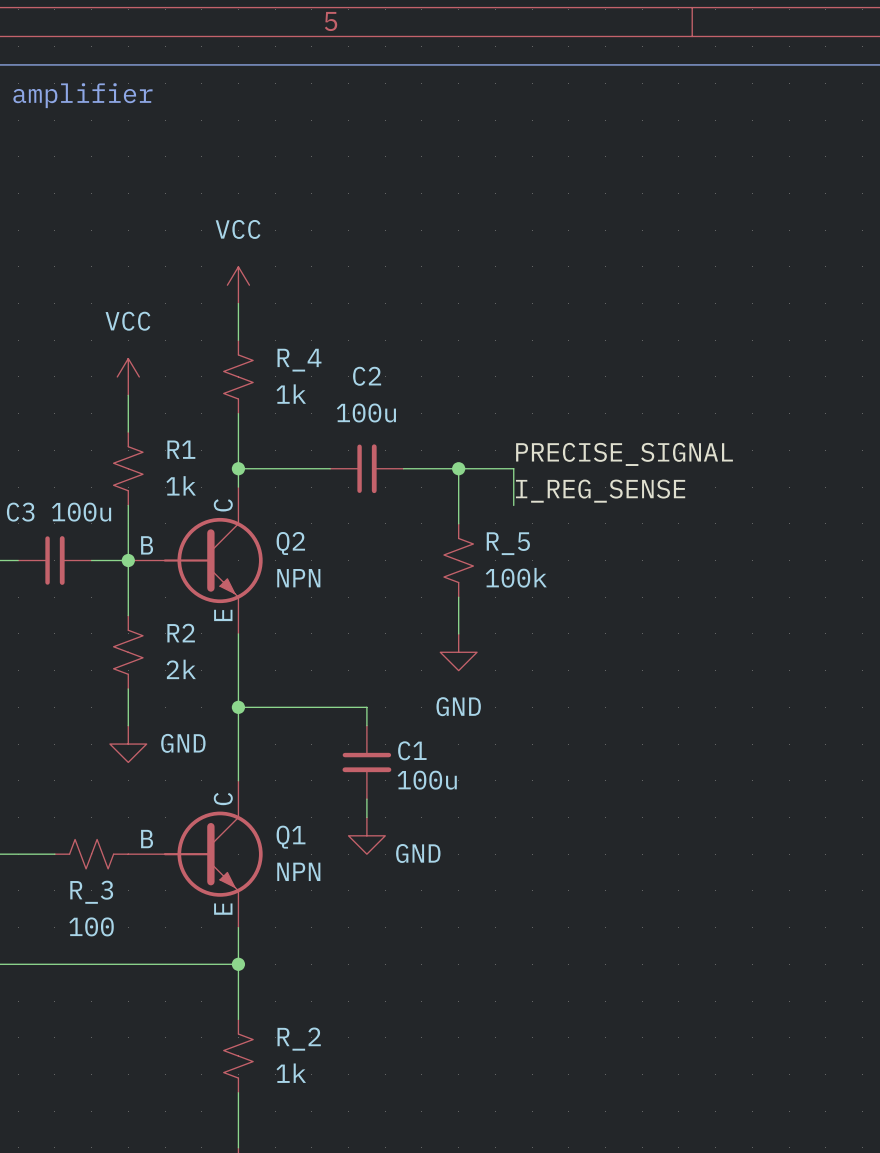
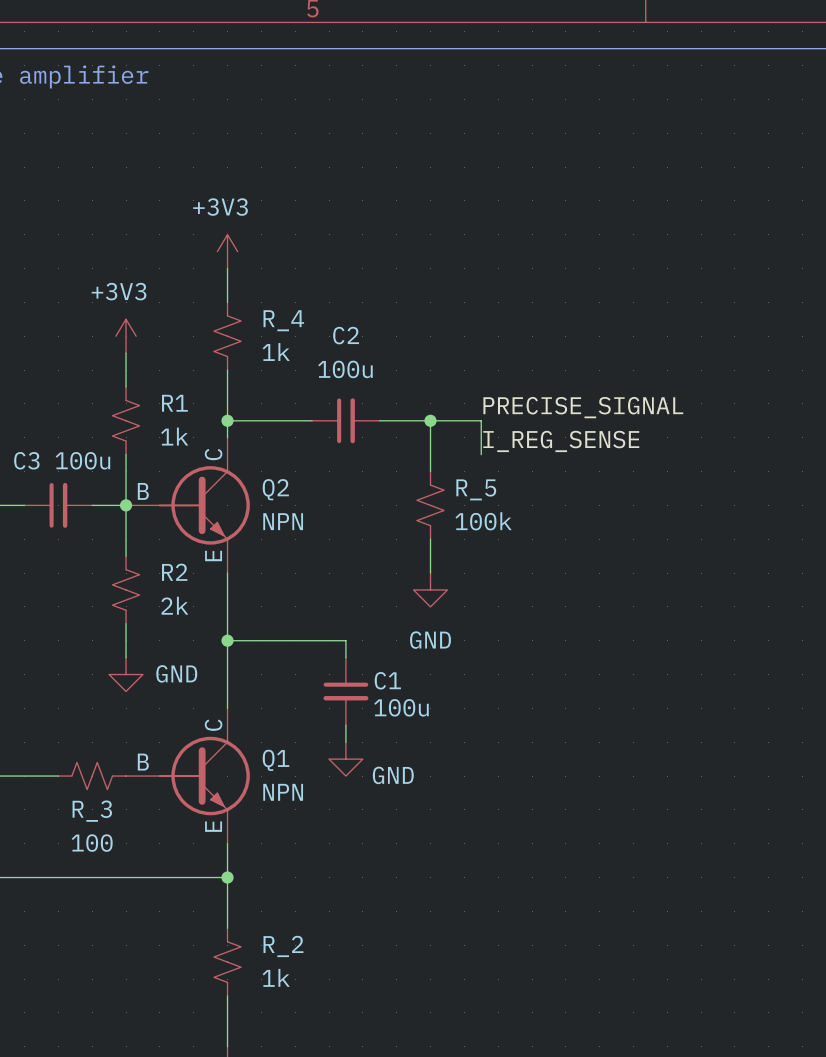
power symbol: VCC (238, 285) -> +3V3 (227, 251)
power symbol: VCC (128, 376) -> +3V3 (126, 336)

